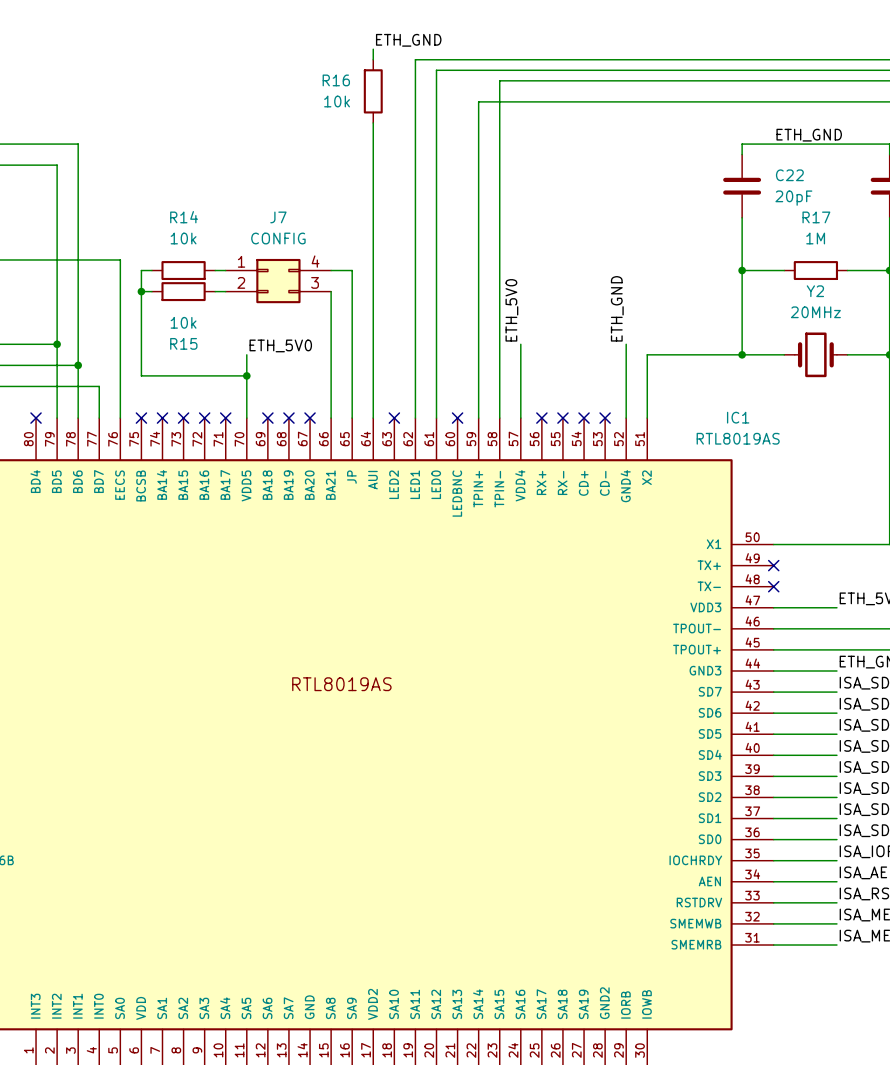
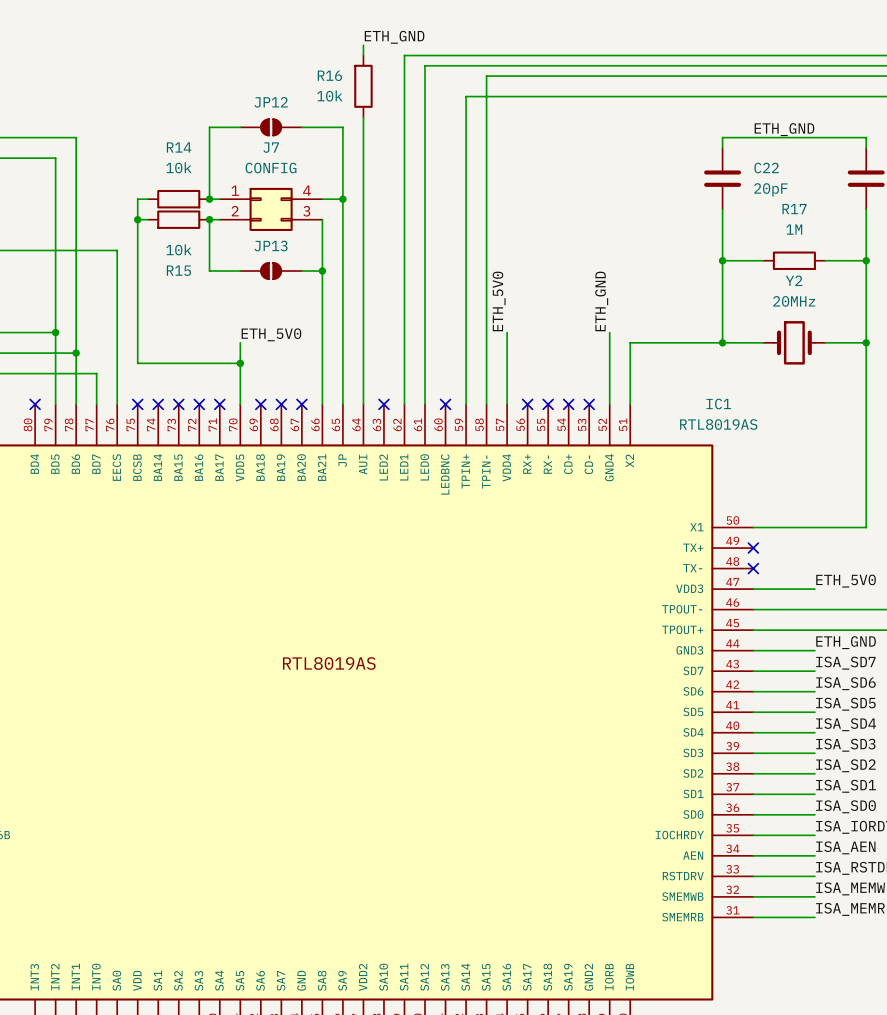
wire: none -> (240, 127) (209, 127) (209, 199) (219, 199)
JP12: none -> (271, 127)
junction: none -> (209, 199)
wire: none -> (322, 199) (342, 199)
junction: none -> (342, 199)
junction: none -> (137, 219)
junction: none -> (209, 219)
wire: none -> (219, 219) (209, 219) (209, 271) (240, 271)
wire: none -> (322, 219) (322, 281)
wire: (141, 270) (151, 270) -> (137, 260) (137, 199) (147, 199)
R14 position: (183, 270) -> (178, 199)
wire: (215, 270) (225, 270) -> none
wire: (331, 270) (352, 270) -> (301, 127) (342, 127) (342, 260)
J7 position: (278, 281) -> (271, 209)
JP13: none -> (271, 271)
wire: none -> (301, 271) (322, 271)
junction: none -> (322, 271)
wire: (141, 291) (151, 291) -> (137, 219) (147, 219)
junction: (141, 291) -> none
R15 position: (183, 291) -> (178, 219)
wire: (215, 291) (225, 291) -> none

